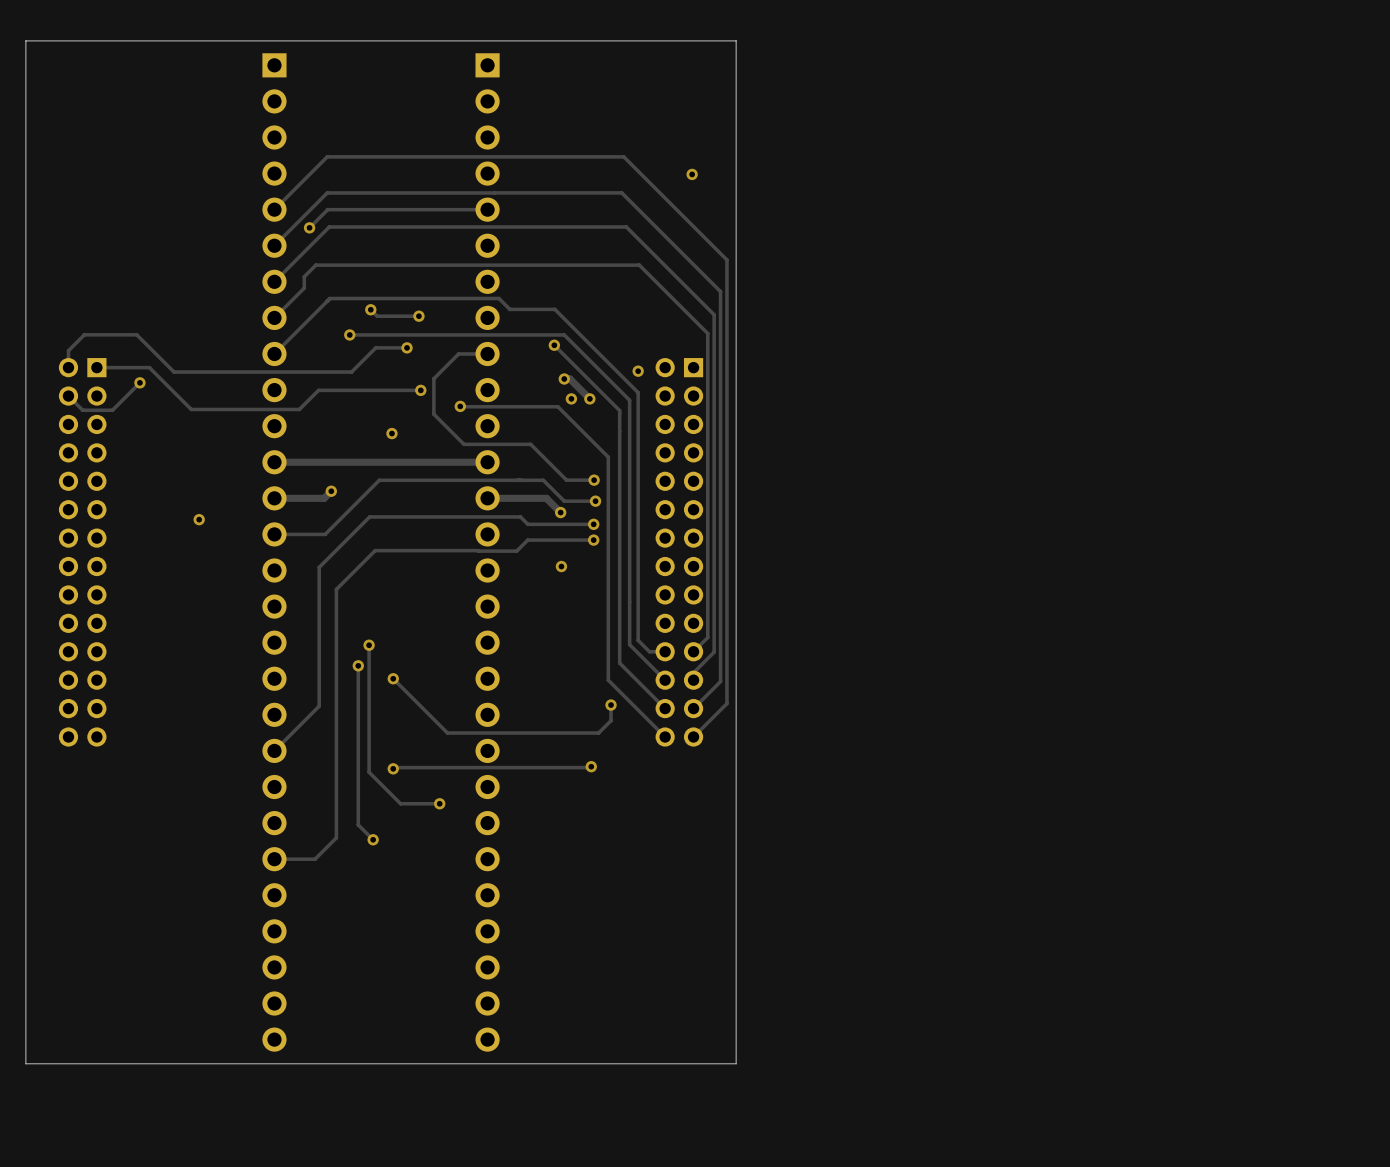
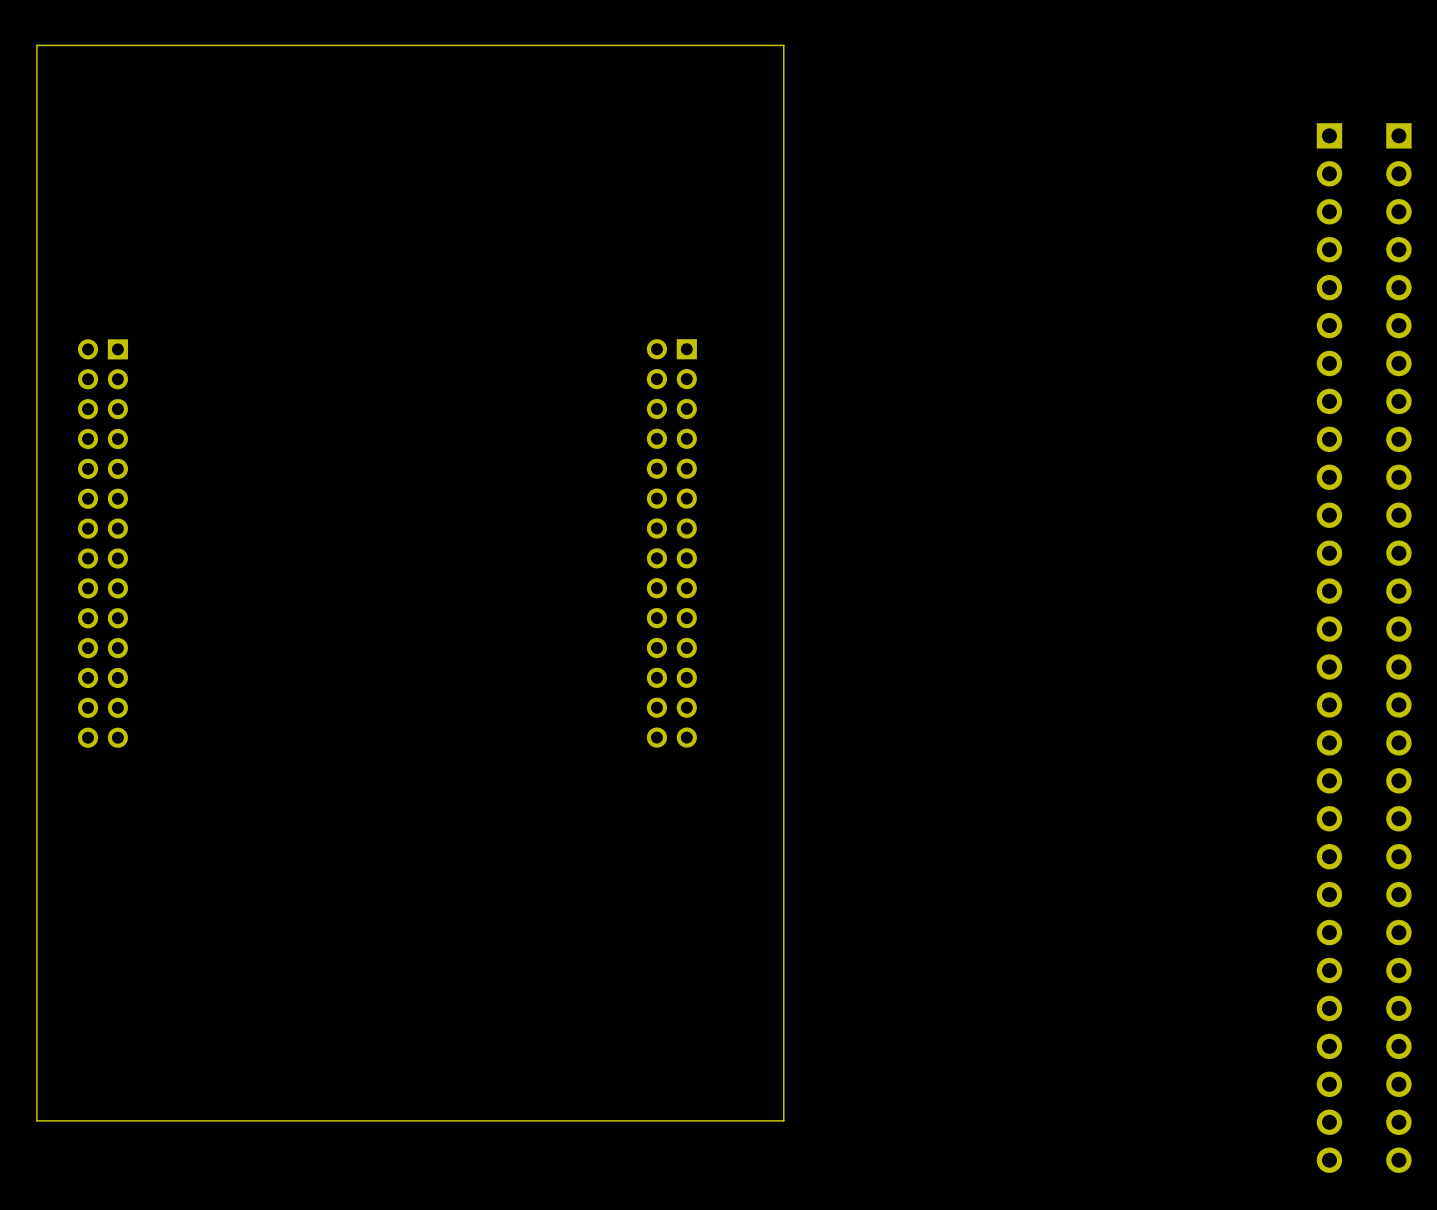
via: (692, 174) -> none
track: (274, 209) (327, 156) (623, 156) (726, 259) (726, 703) (693, 737) -> none
track: (487, 209) (327, 209) (309, 227) -> none
via: (309, 227) -> none
track: (274, 245) (327, 192) (621, 192) (720, 291) (720, 681) (693, 708) -> none
track: (274, 281) (329, 226) (626, 226) (714, 314) (714, 652) (693, 672) (693, 680) -> none
track: (370, 309) (377, 316) (418, 316) -> none
via: (370, 309) -> none
via: (418, 316) -> none
track: (274, 317) (304, 288) (304, 276) (315, 265) (639, 265) (707, 333) (707, 637) (693, 651) -> none
track: (349, 334) (564, 334) (629, 400) (629, 644) (665, 680) -> none
via: (349, 334) -> none
track: (554, 345) (619, 410) (619, 663) (665, 708) -> none
via: (554, 345) -> none
track: (407, 347) (375, 347) (351, 372) (174, 372) (136, 334) (84, 334) (68, 350) (68, 367) -> none
via: (407, 347) -> none
track: (274, 354) (329, 298) (499, 298) (509, 309) (554, 309) (638, 392) (638, 640) (649, 651) (665, 651) -> none
track: (487, 354) (458, 354) (433, 378) (433, 414) (463, 444) (530, 444) (566, 480) (594, 480) -> none
track: (96, 367) (149, 367) (191, 409) (299, 409) (318, 390) (420, 390) -> none
via: (638, 371) -> none
track: (564, 379) (569, 379) (589, 398) -> none
via: (564, 379) -> none
track: (139, 382) (112, 410) (82, 410) (68, 396) -> none
via: (139, 382) -> none
via: (420, 390) -> none
via: (571, 398) -> none
via: (589, 398) -> none
track: (460, 406) (557, 406) (608, 457) (608, 680) (665, 737) -> none
via: (460, 406) -> none
via: (391, 433) -> none
track: (487, 462) (274, 462) -> none
via: (594, 480) -> none
track: (331, 491) (324, 498) (274, 498) -> none
via: (331, 491) -> none
track: (487, 498) (546, 498) (560, 512) -> none
track: (595, 501) (564, 501) (543, 480) (379, 480) (325, 534) (274, 534) -> none
via: (595, 501) -> none
via: (560, 512) -> none
via: (199, 519) -> none
track: (593, 524) (527, 524) (520, 516) (369, 516) (319, 567) (319, 706) (274, 750) -> none
via: (593, 524) -> none
track: (593, 540) (527, 540) (516, 551) (375, 550) (336, 589) (336, 837) (315, 859) (274, 859) -> none
via: (593, 540) -> none
part position: (82, 552) -> (102, 543)
part: (274, 552) -> none
part: (487, 552) -> none
part position: (679, 552) -> (671, 543)
via: (561, 566) -> none
part: none -> (1329, 648)
part: none -> (1398, 648)
track: (369, 645) (369, 772) (400, 803) (439, 803) -> none
via: (369, 645) -> none
track: (358, 665) (358, 824) (373, 839) -> none
via: (358, 665) -> none
track: (393, 678) (447, 733) (598, 733) (611, 720) (611, 705) -> none
via: (393, 678) -> none
via: (611, 705) -> none
track: (591, 766) (393, 768) -> none
via: (591, 766) -> none
via: (393, 768) -> none
via: (439, 803) -> none
via: (373, 839) -> none

